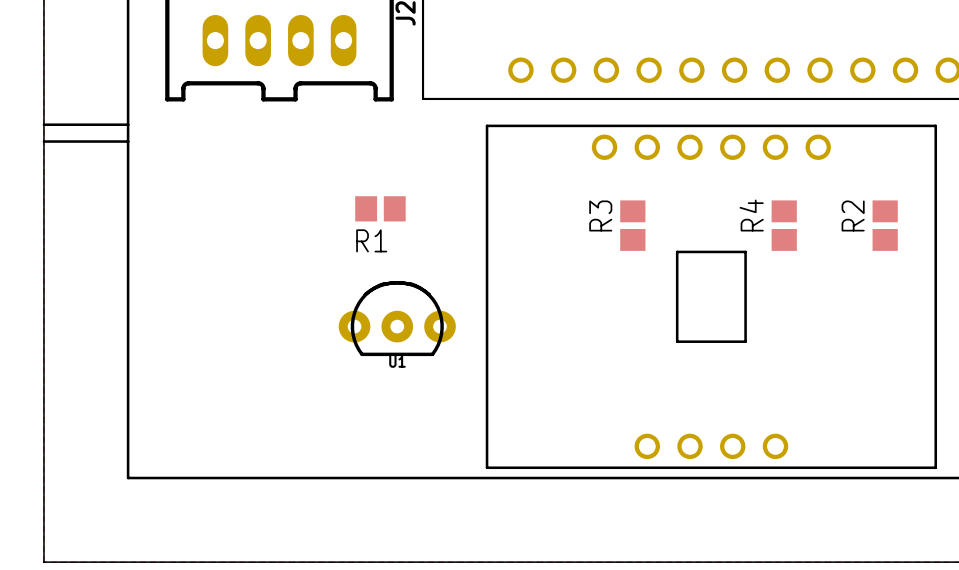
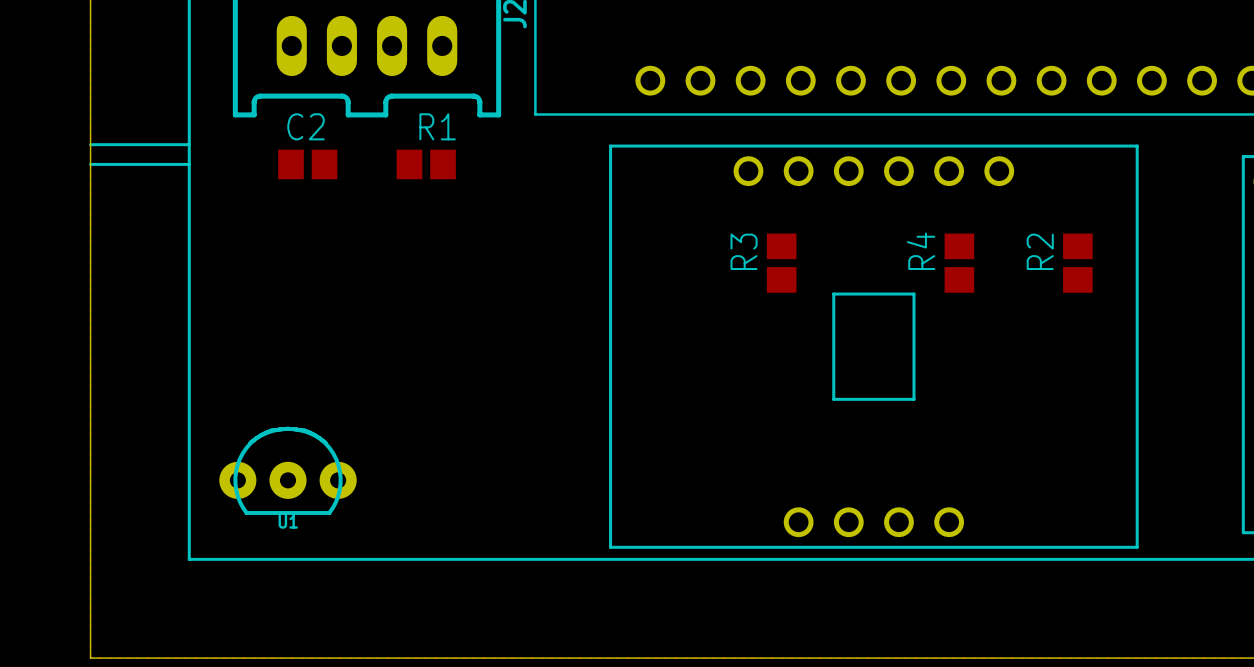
C2: none -> (307, 164)
R1 position: (380, 208) -> (426, 164)
R1 name position: R1 (371, 240) -> R1 (437, 126)
U1 position: (397, 318) -> (288, 470)

